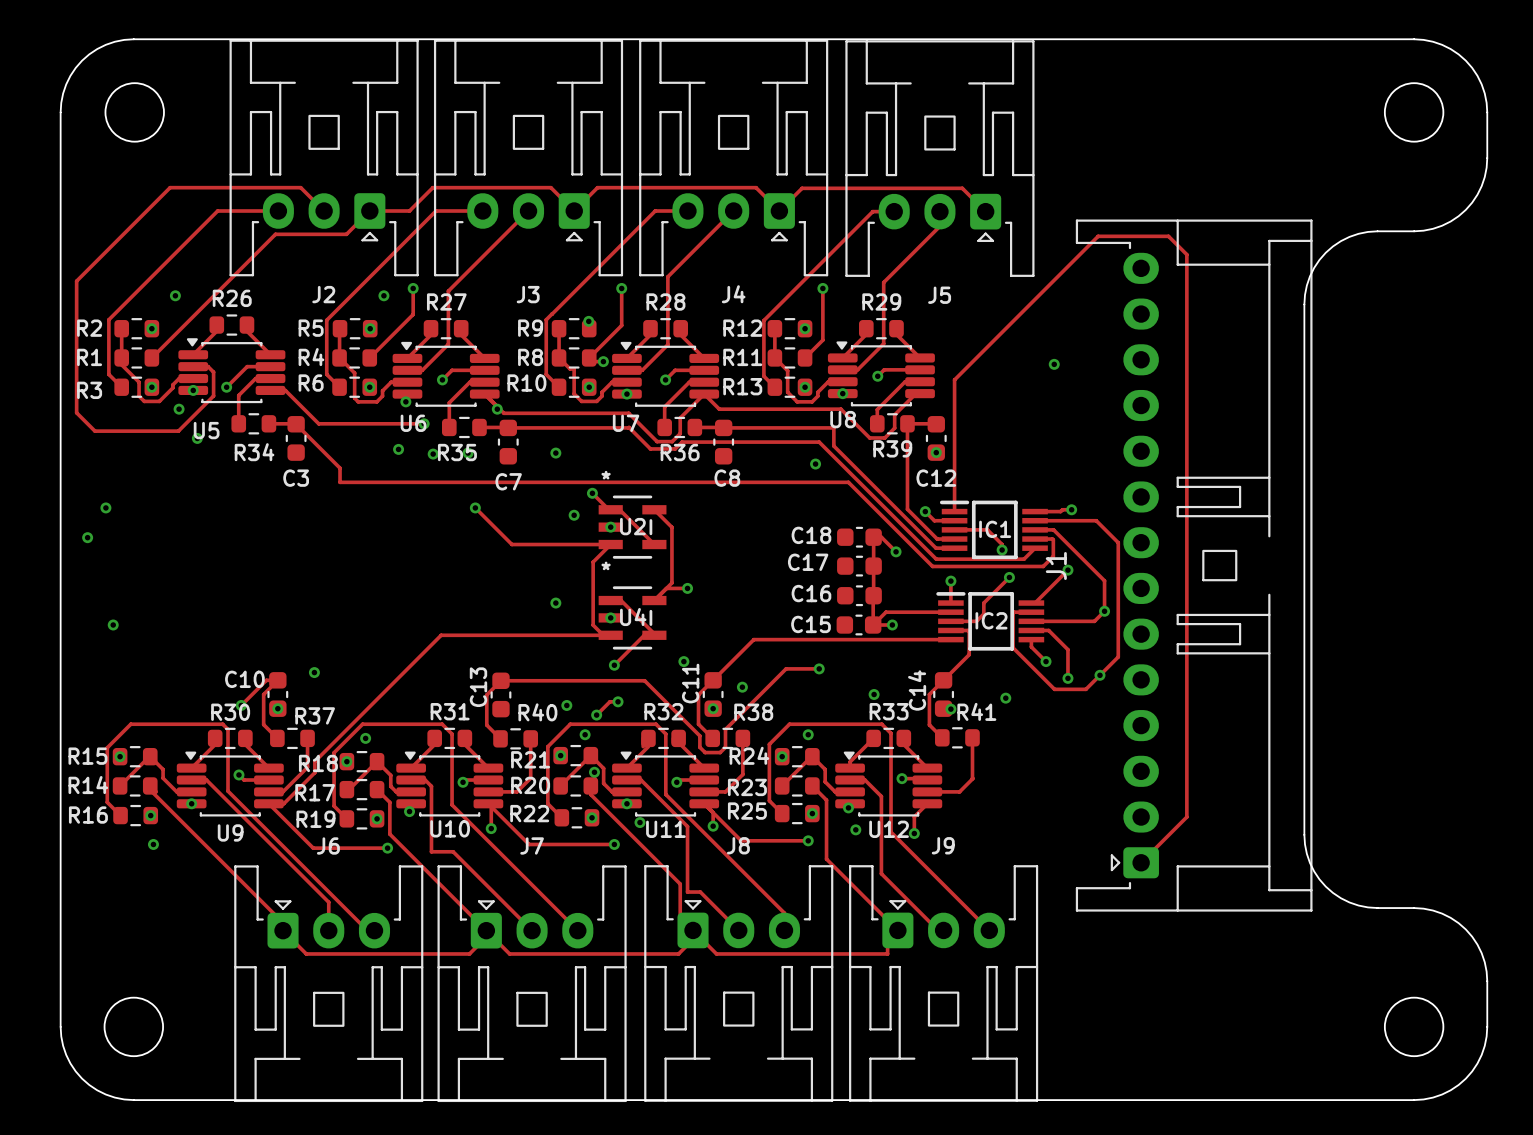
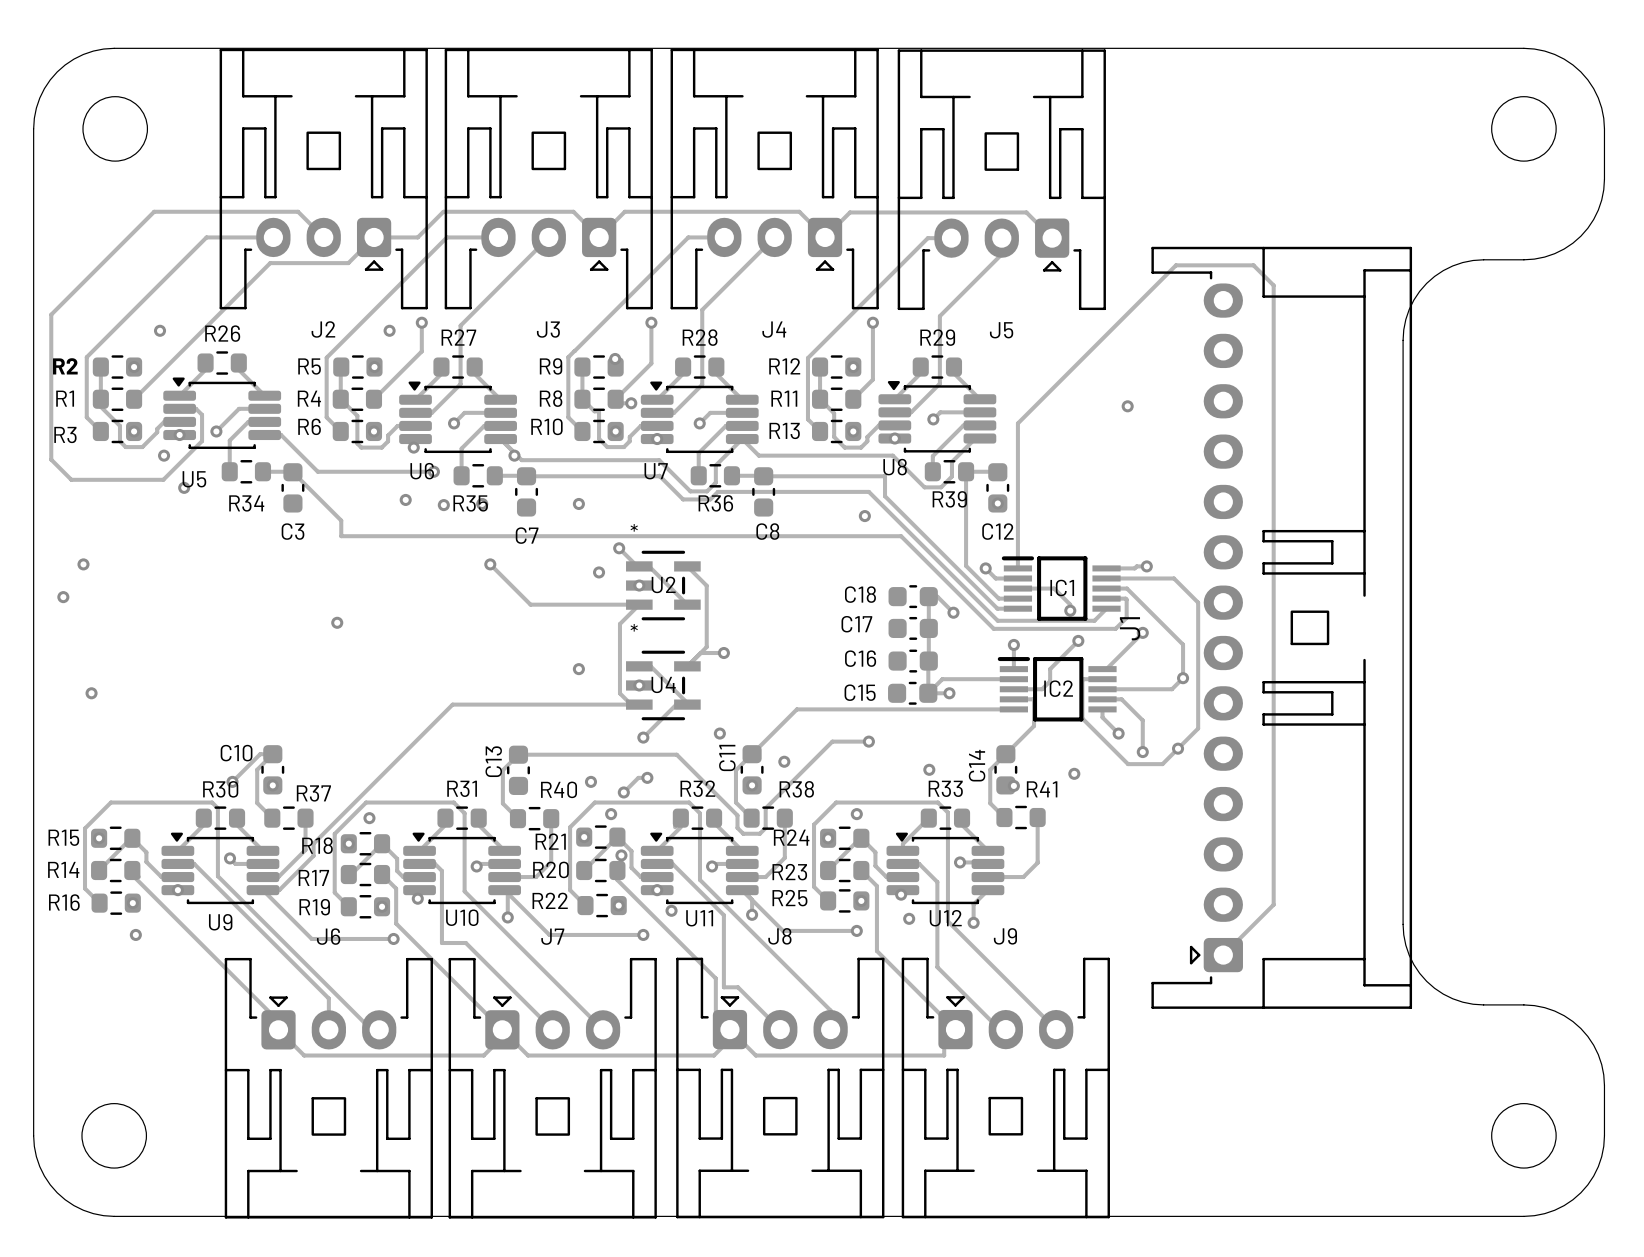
via: none -> (337, 622)
via: (314, 672) -> none

